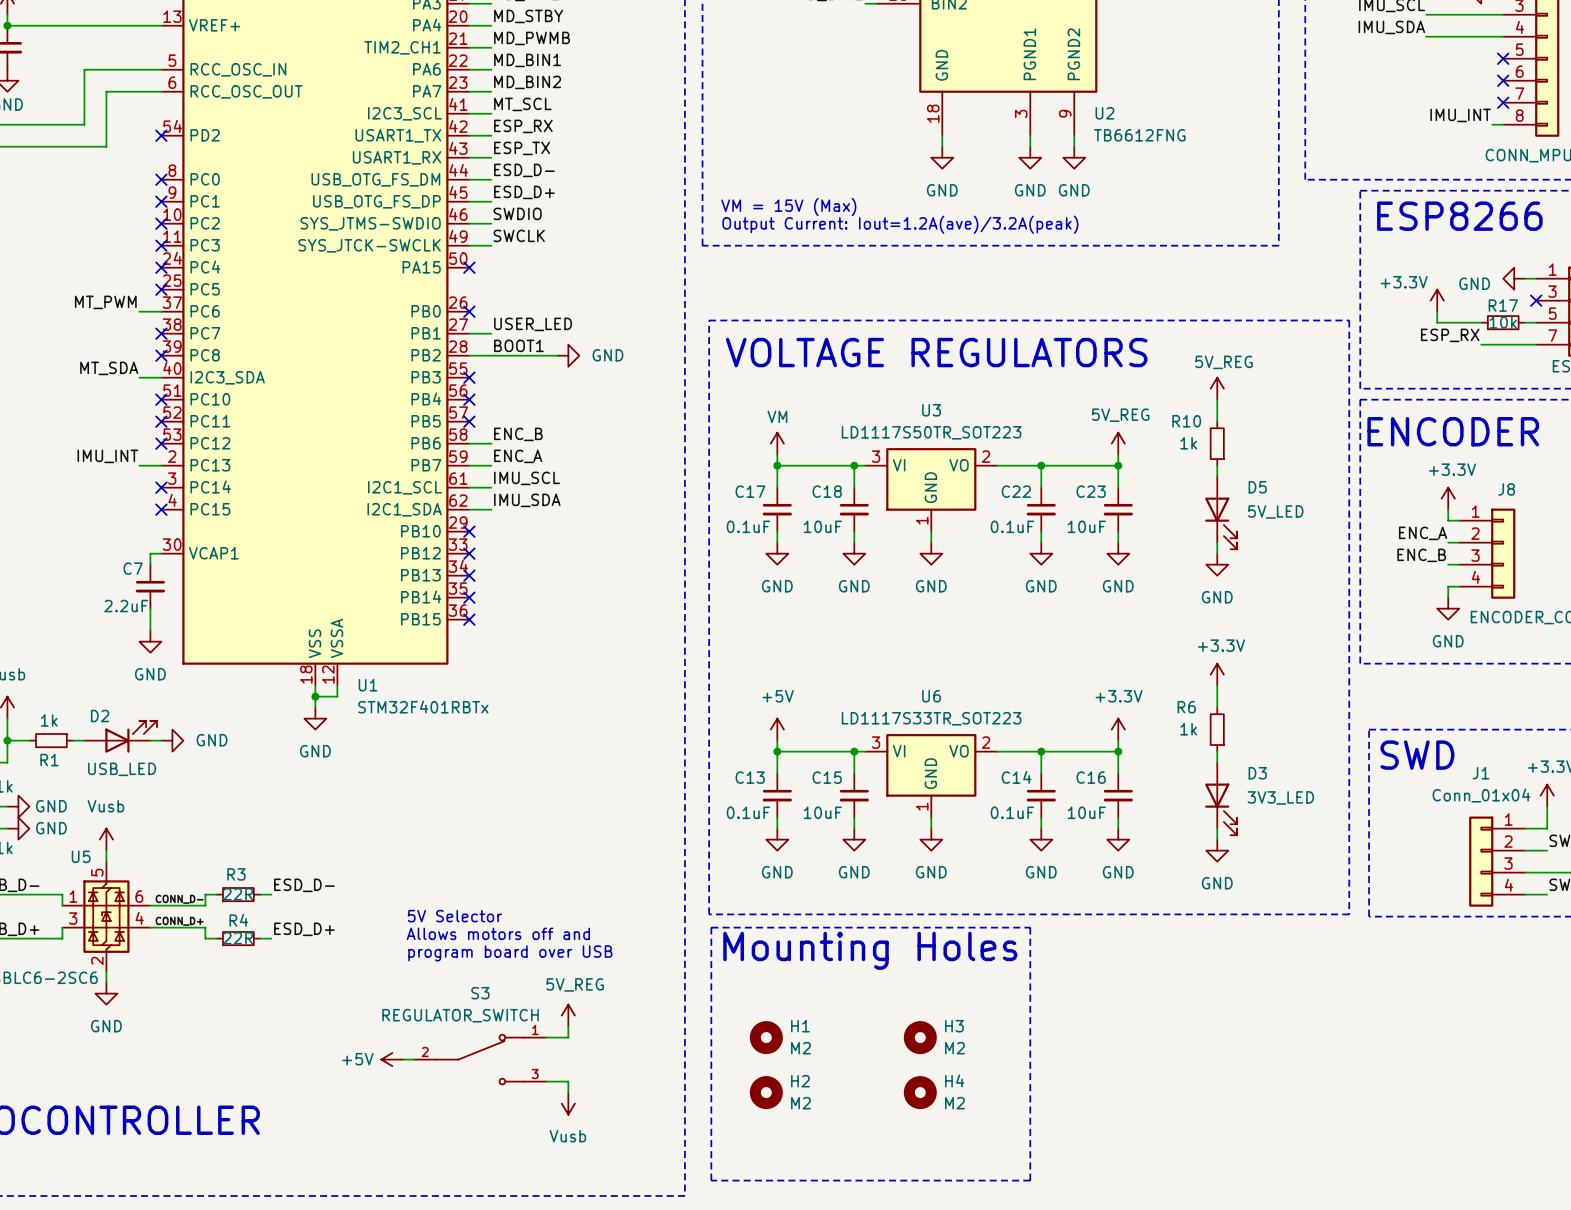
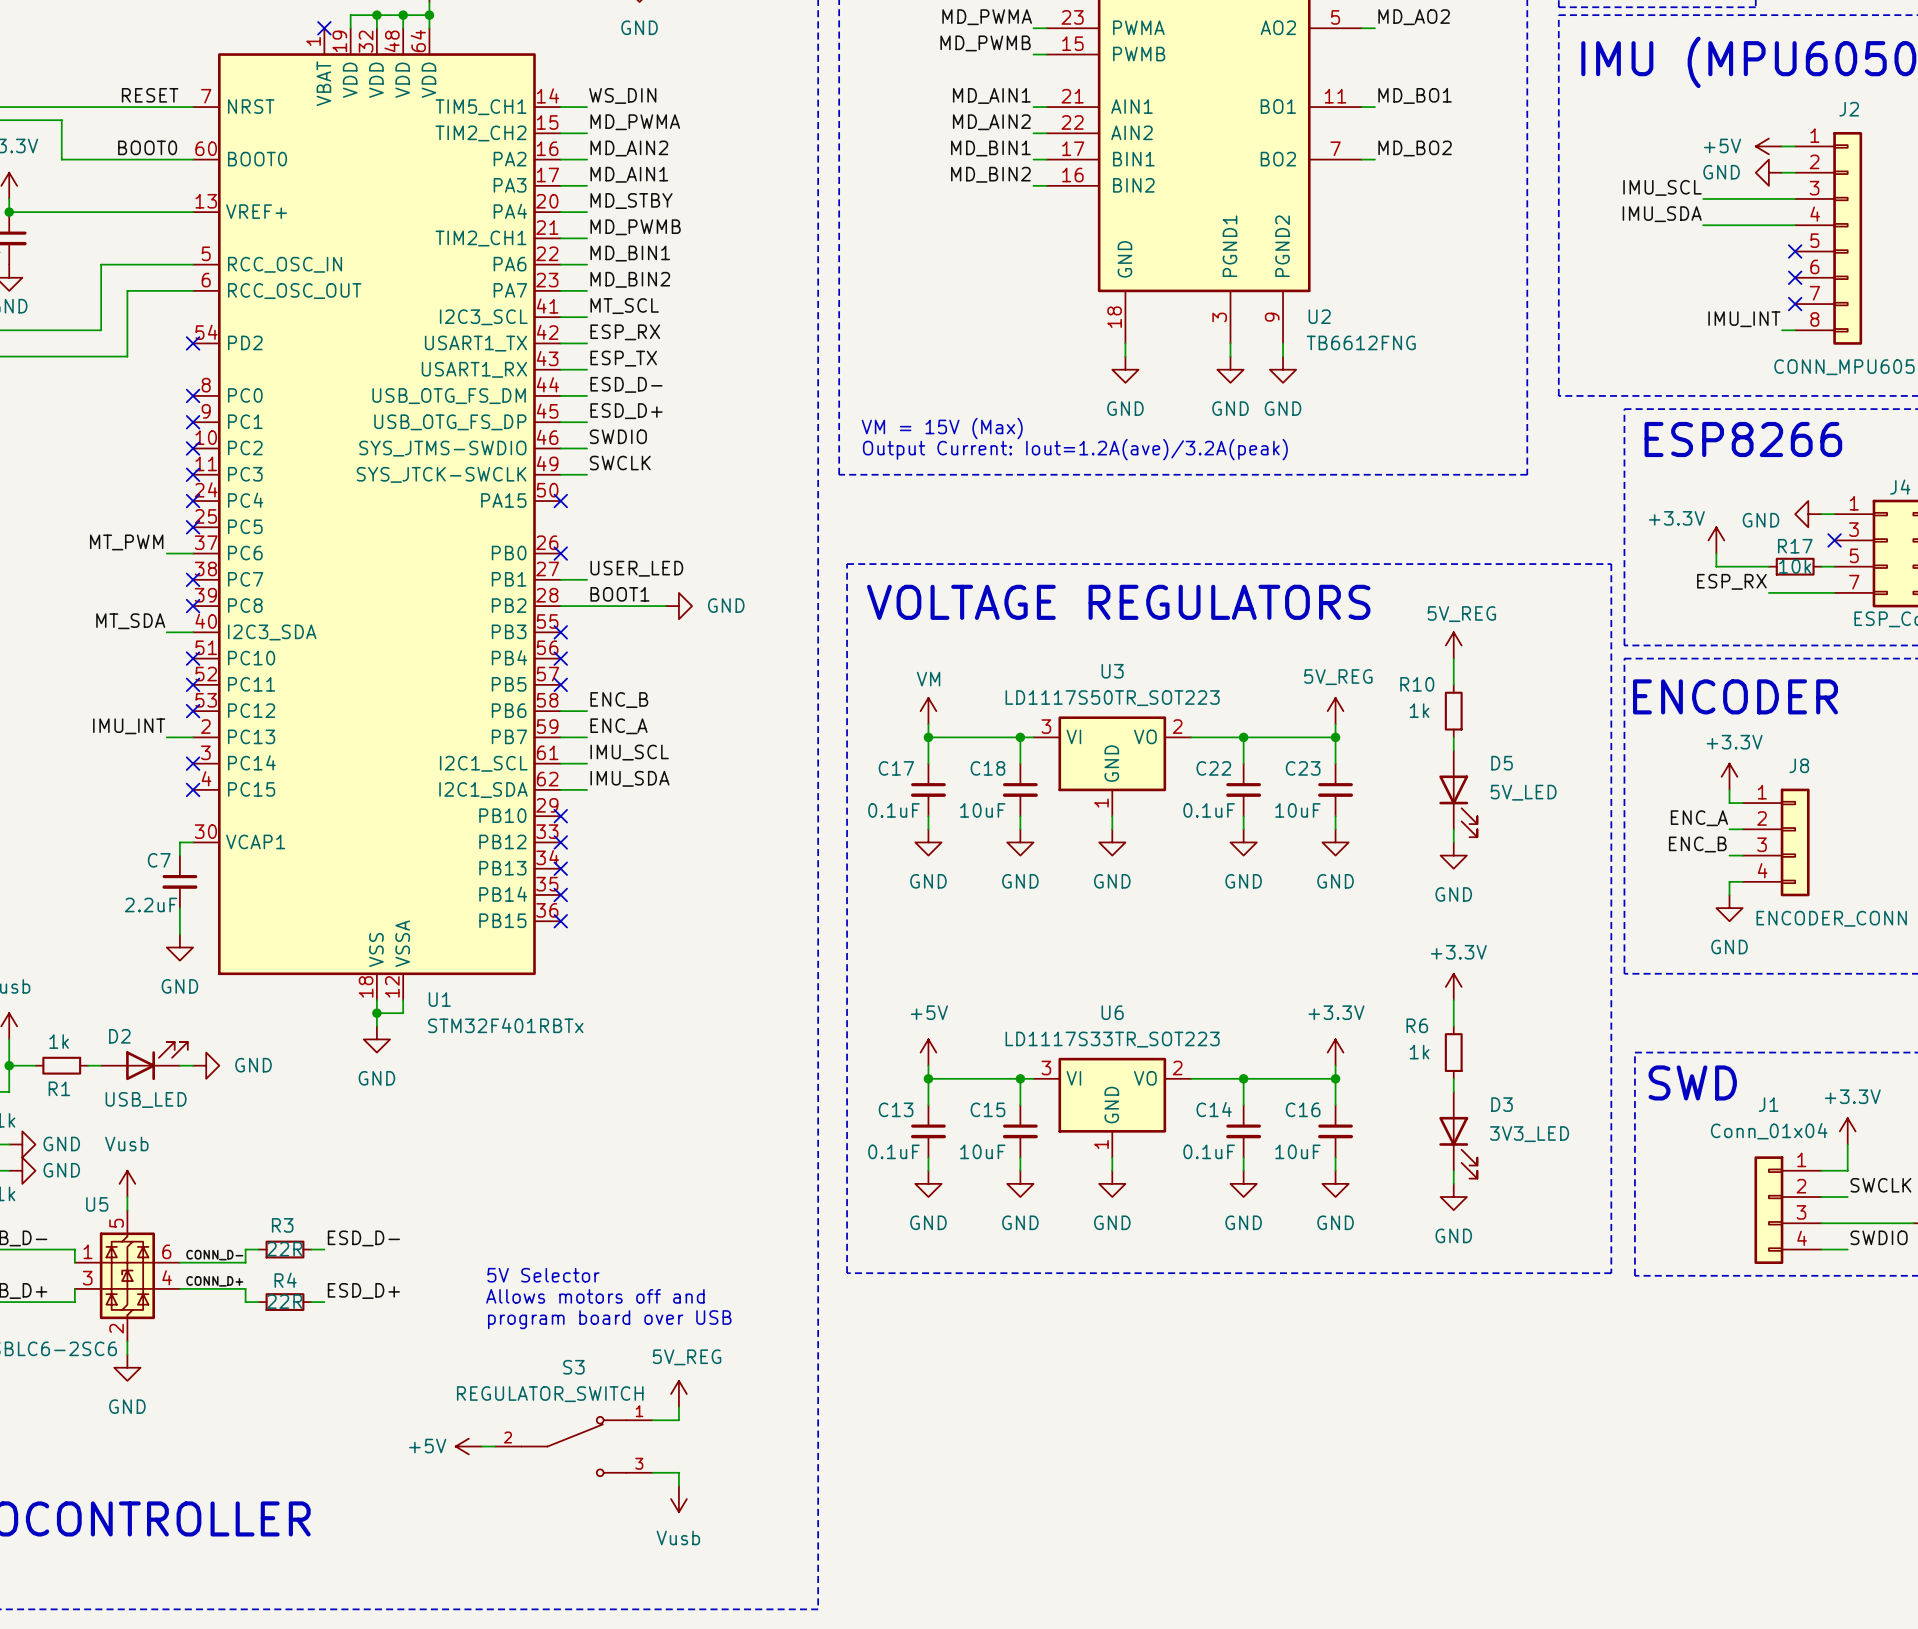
line: (711, 927) (1030, 927) (1030, 1180) (711, 1180) (711, 927) -> none
text: Mounting Holes (870, 950) -> none
H1: M2 (766, 1037) -> none
H3: M2 (920, 1037) -> none
H2: M2 (766, 1092) -> none
H4: M2 (920, 1092) -> none

